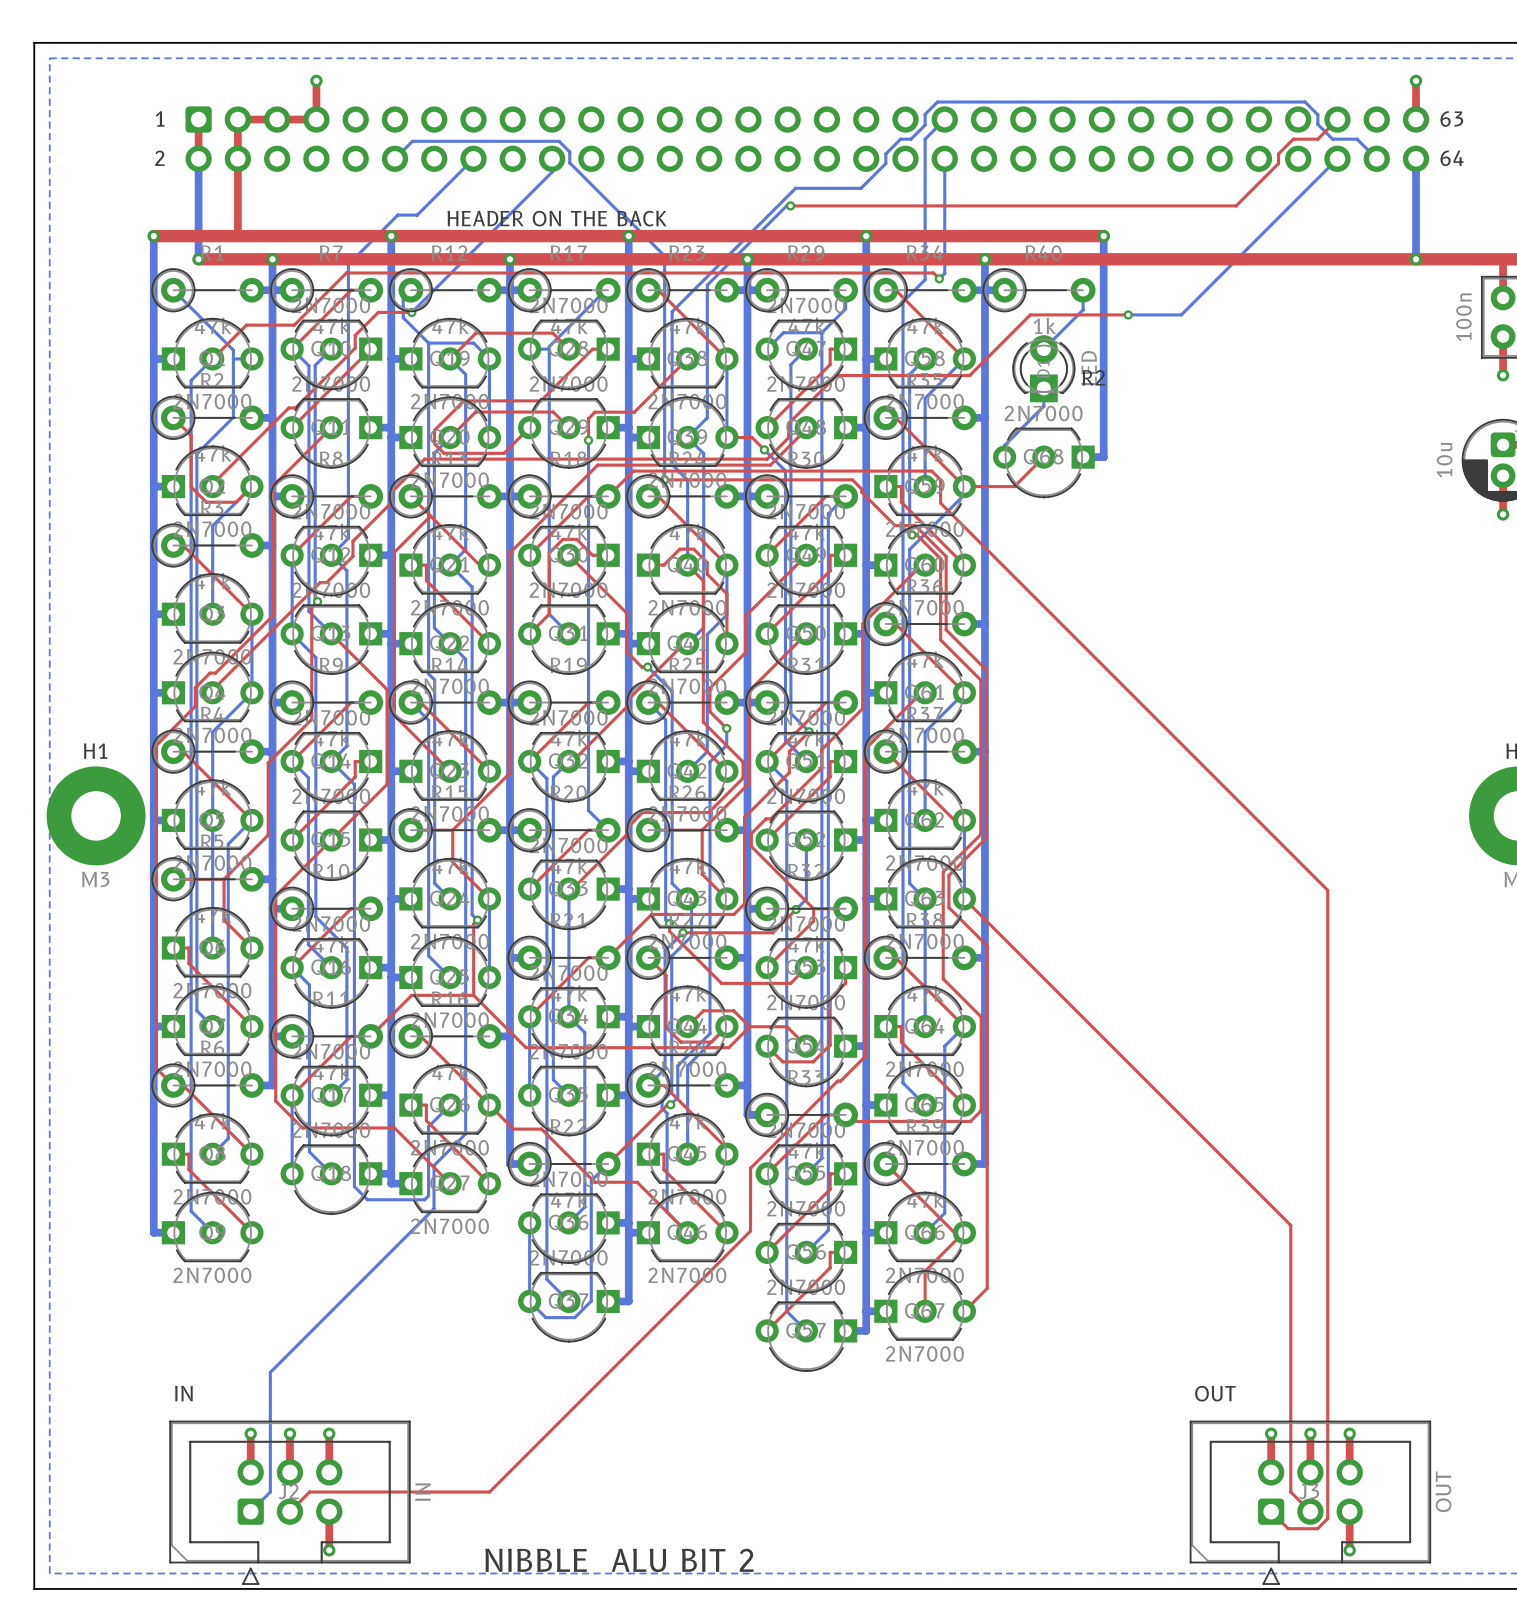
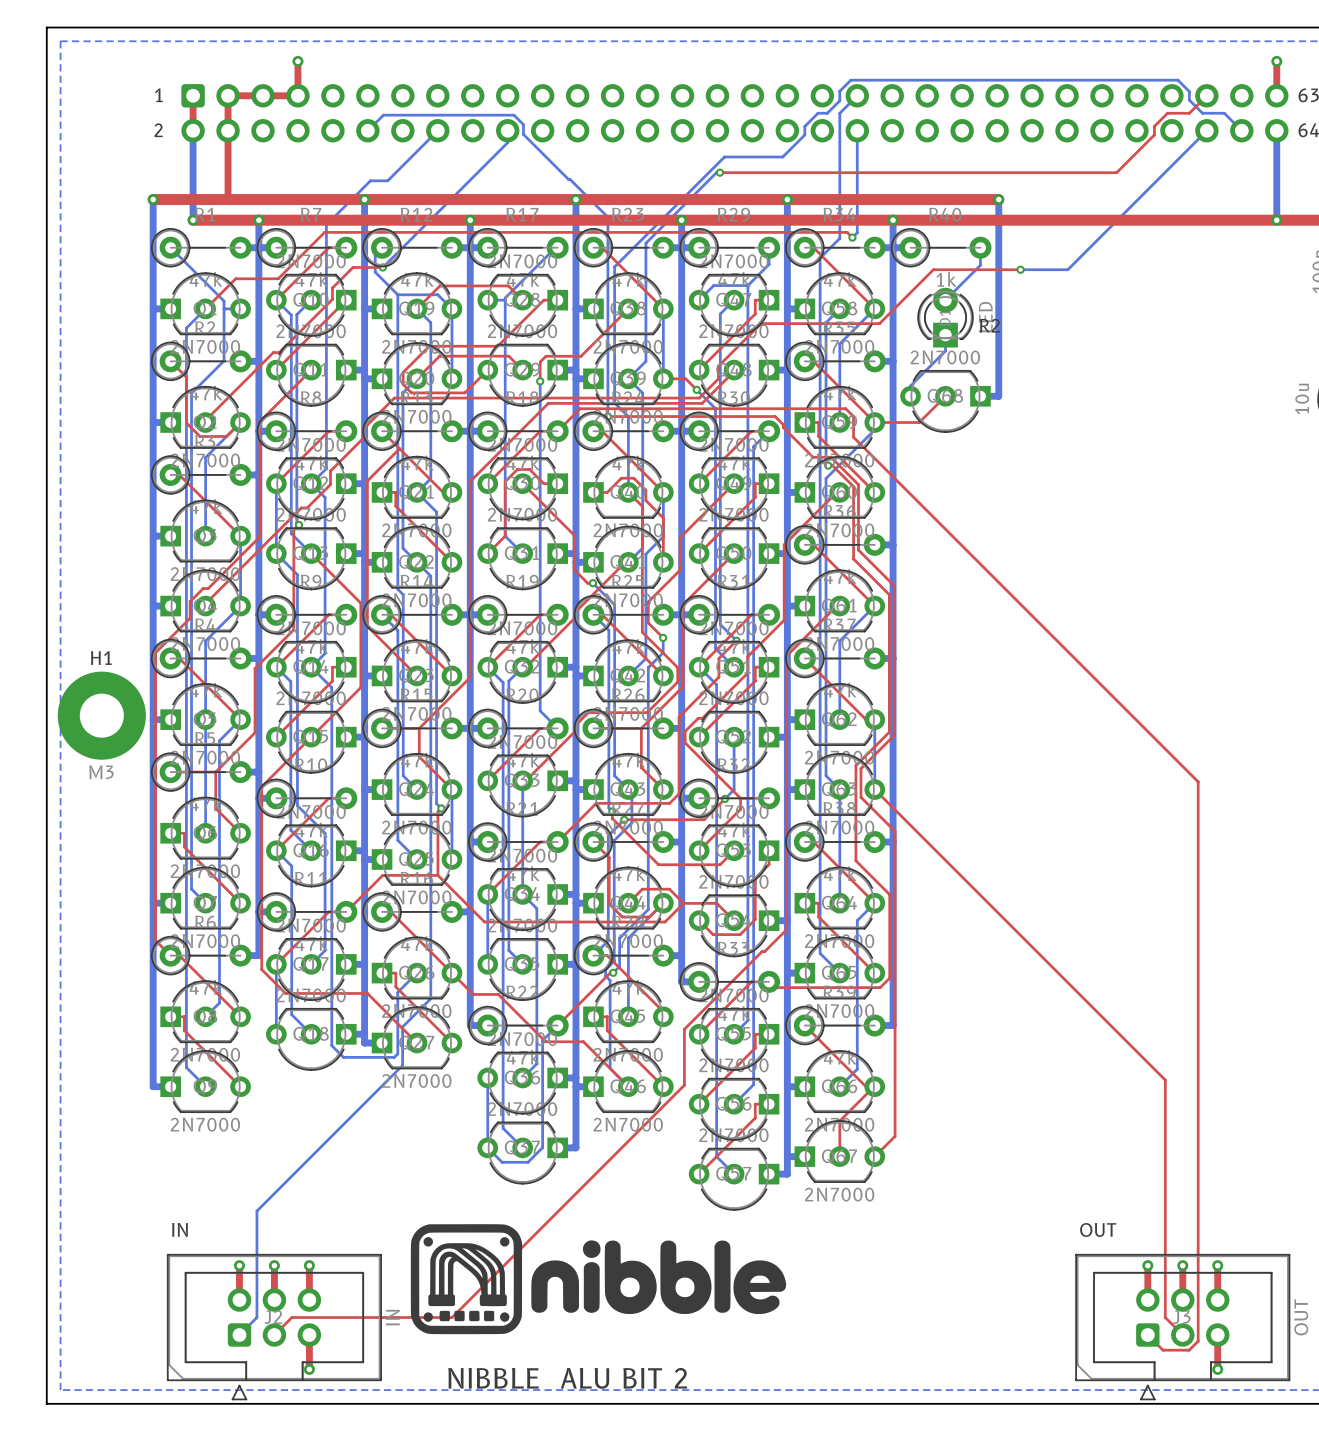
text: HEADER ON THE BACK (557, 218) -> none
drawing: none -> [410, 1224, 787, 1335]

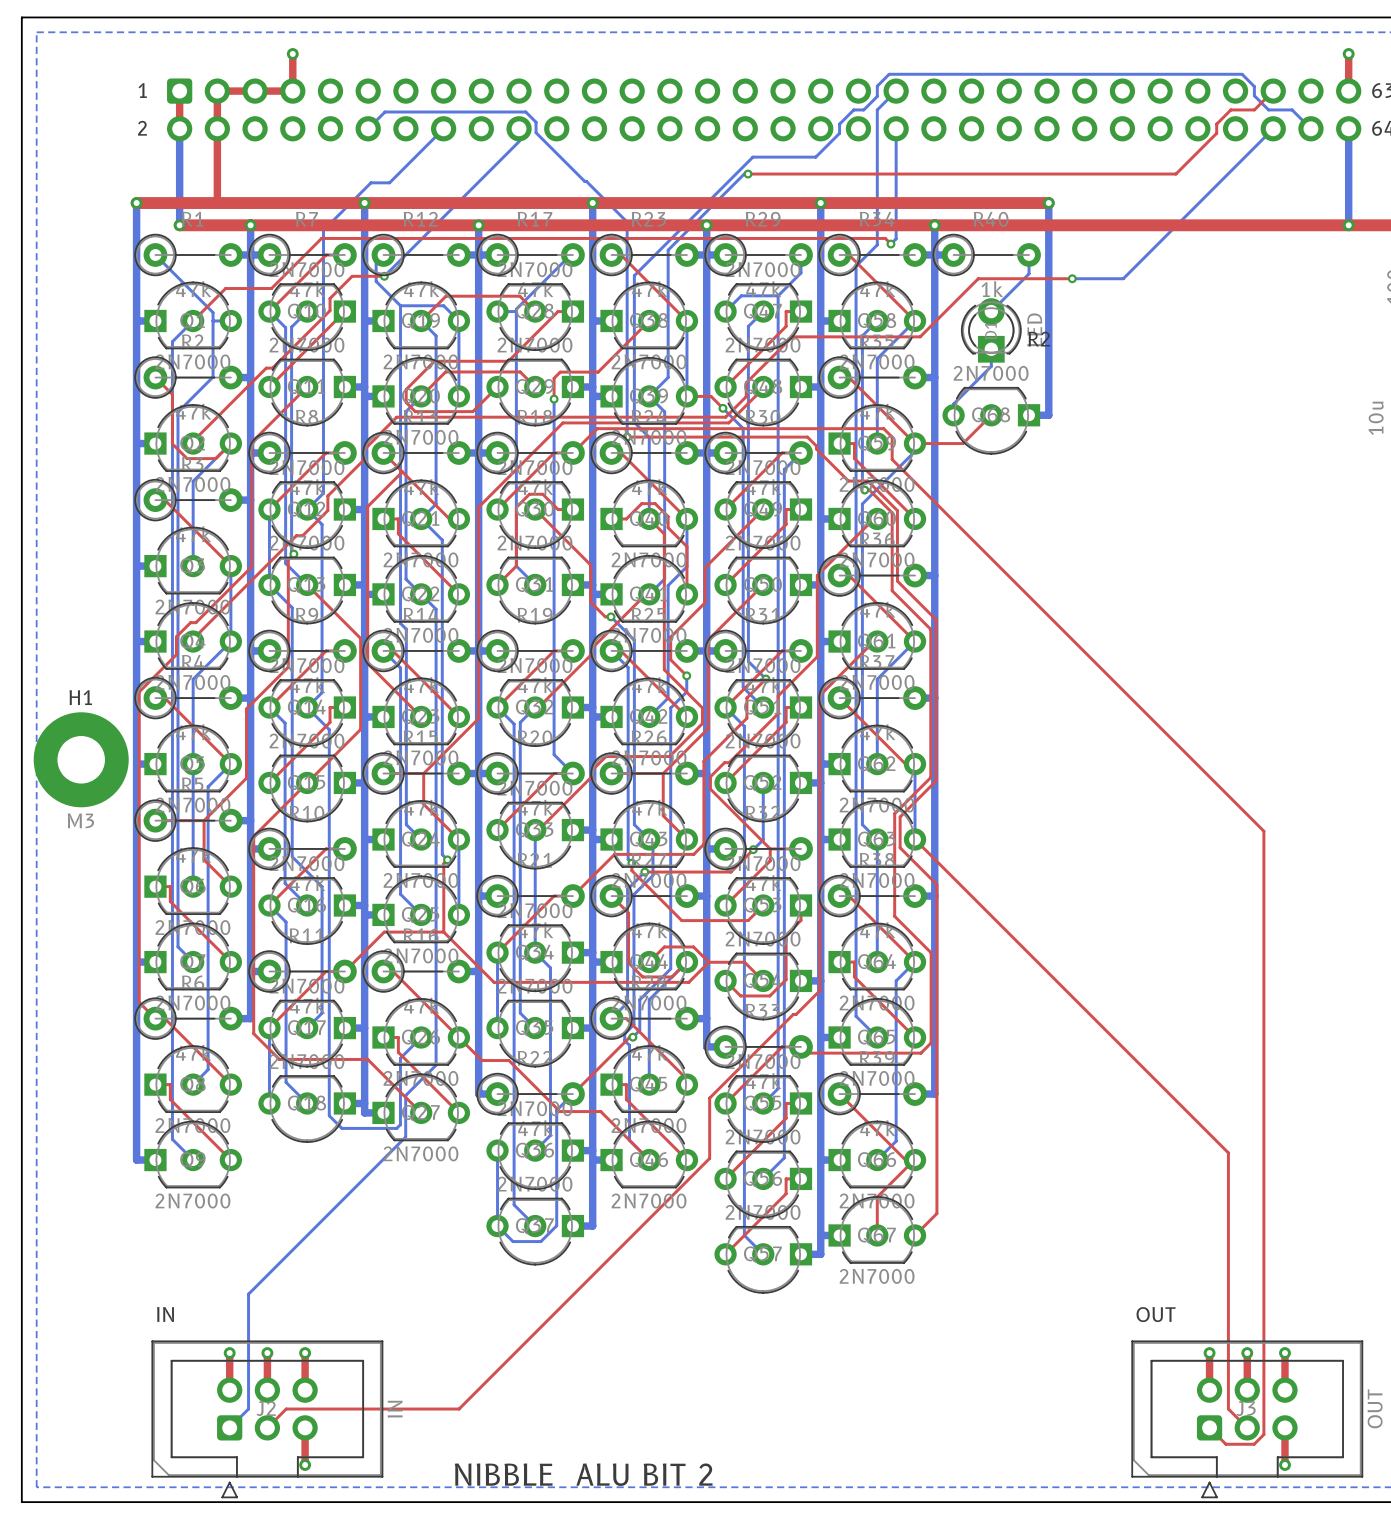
drawing: [410, 1224, 787, 1335] -> none

